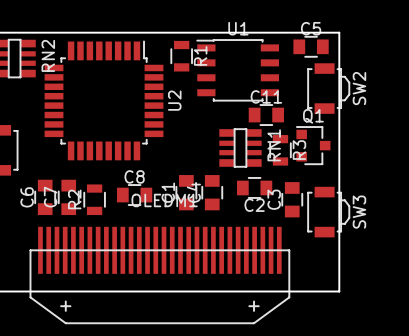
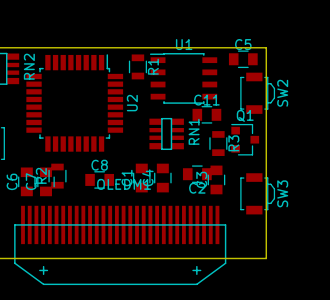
RN1 position: (240, 147) -> (166, 133)
R2 position: (94, 199) -> (57, 176)
C3 position: (292, 199) -> (216, 179)

